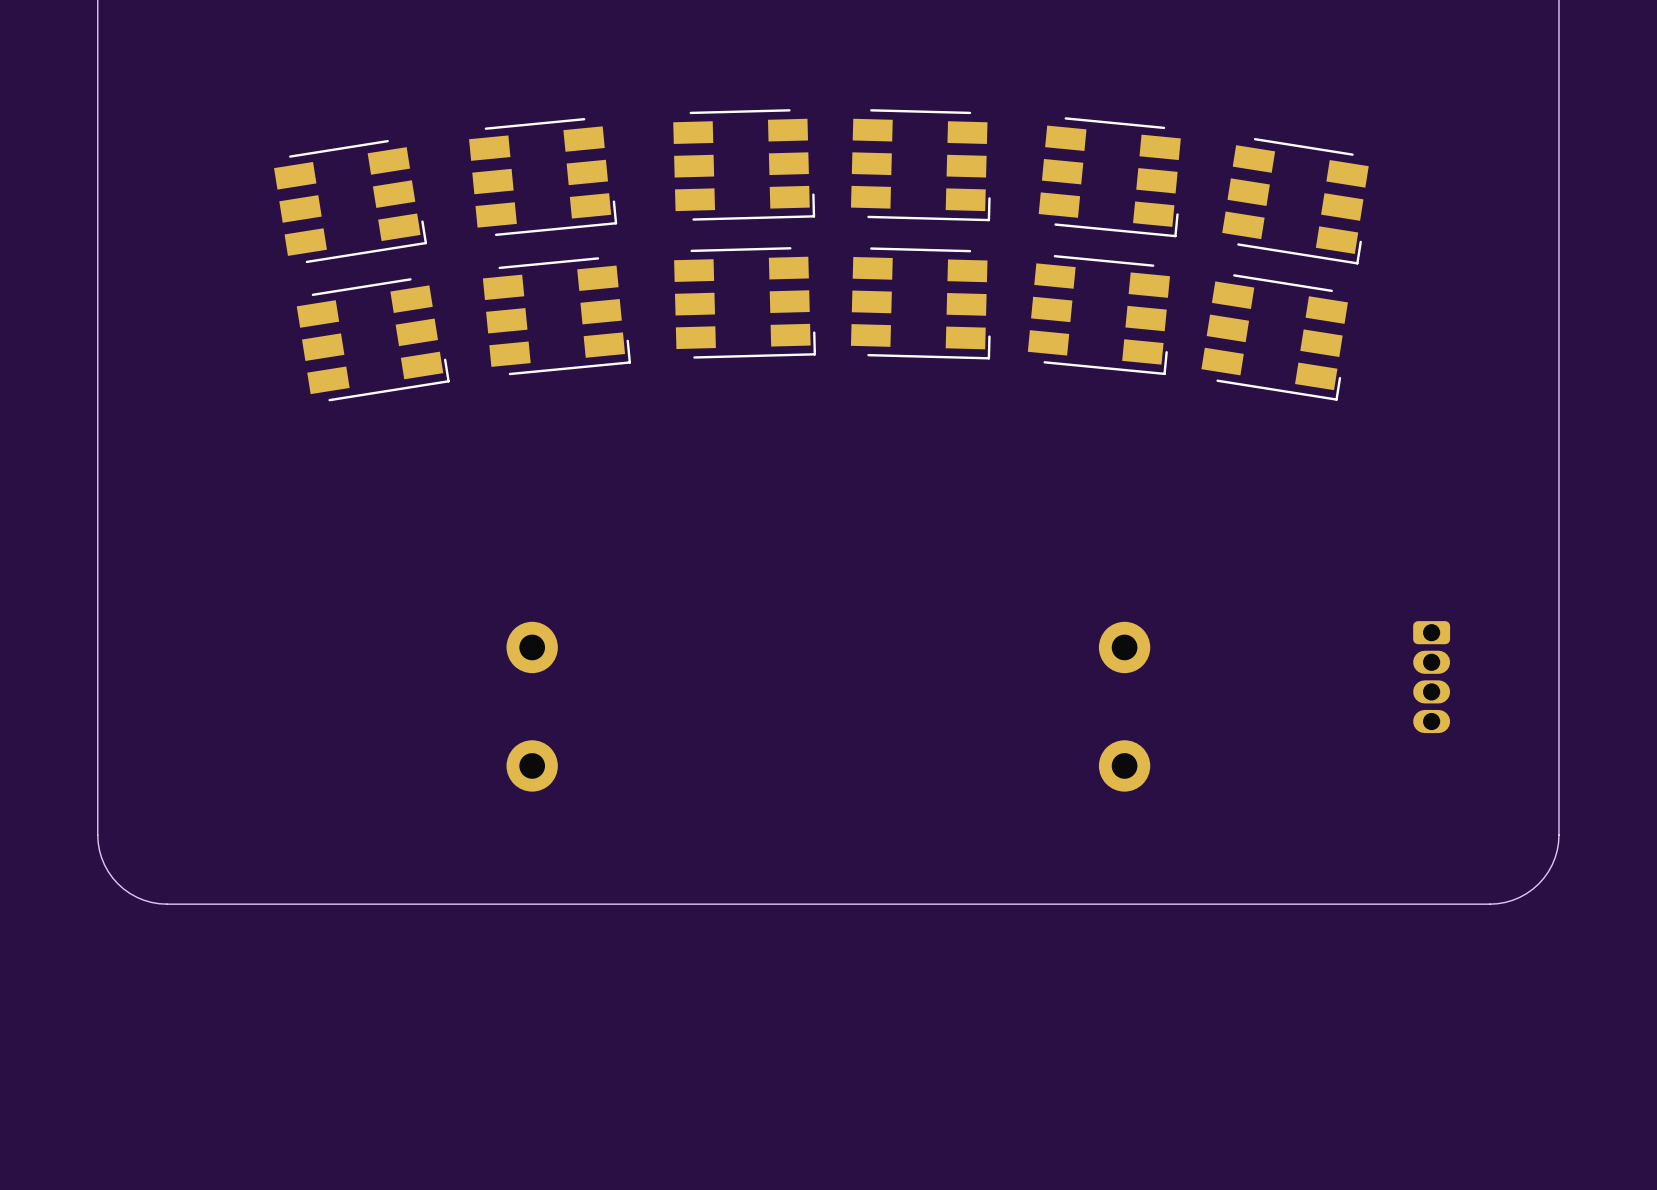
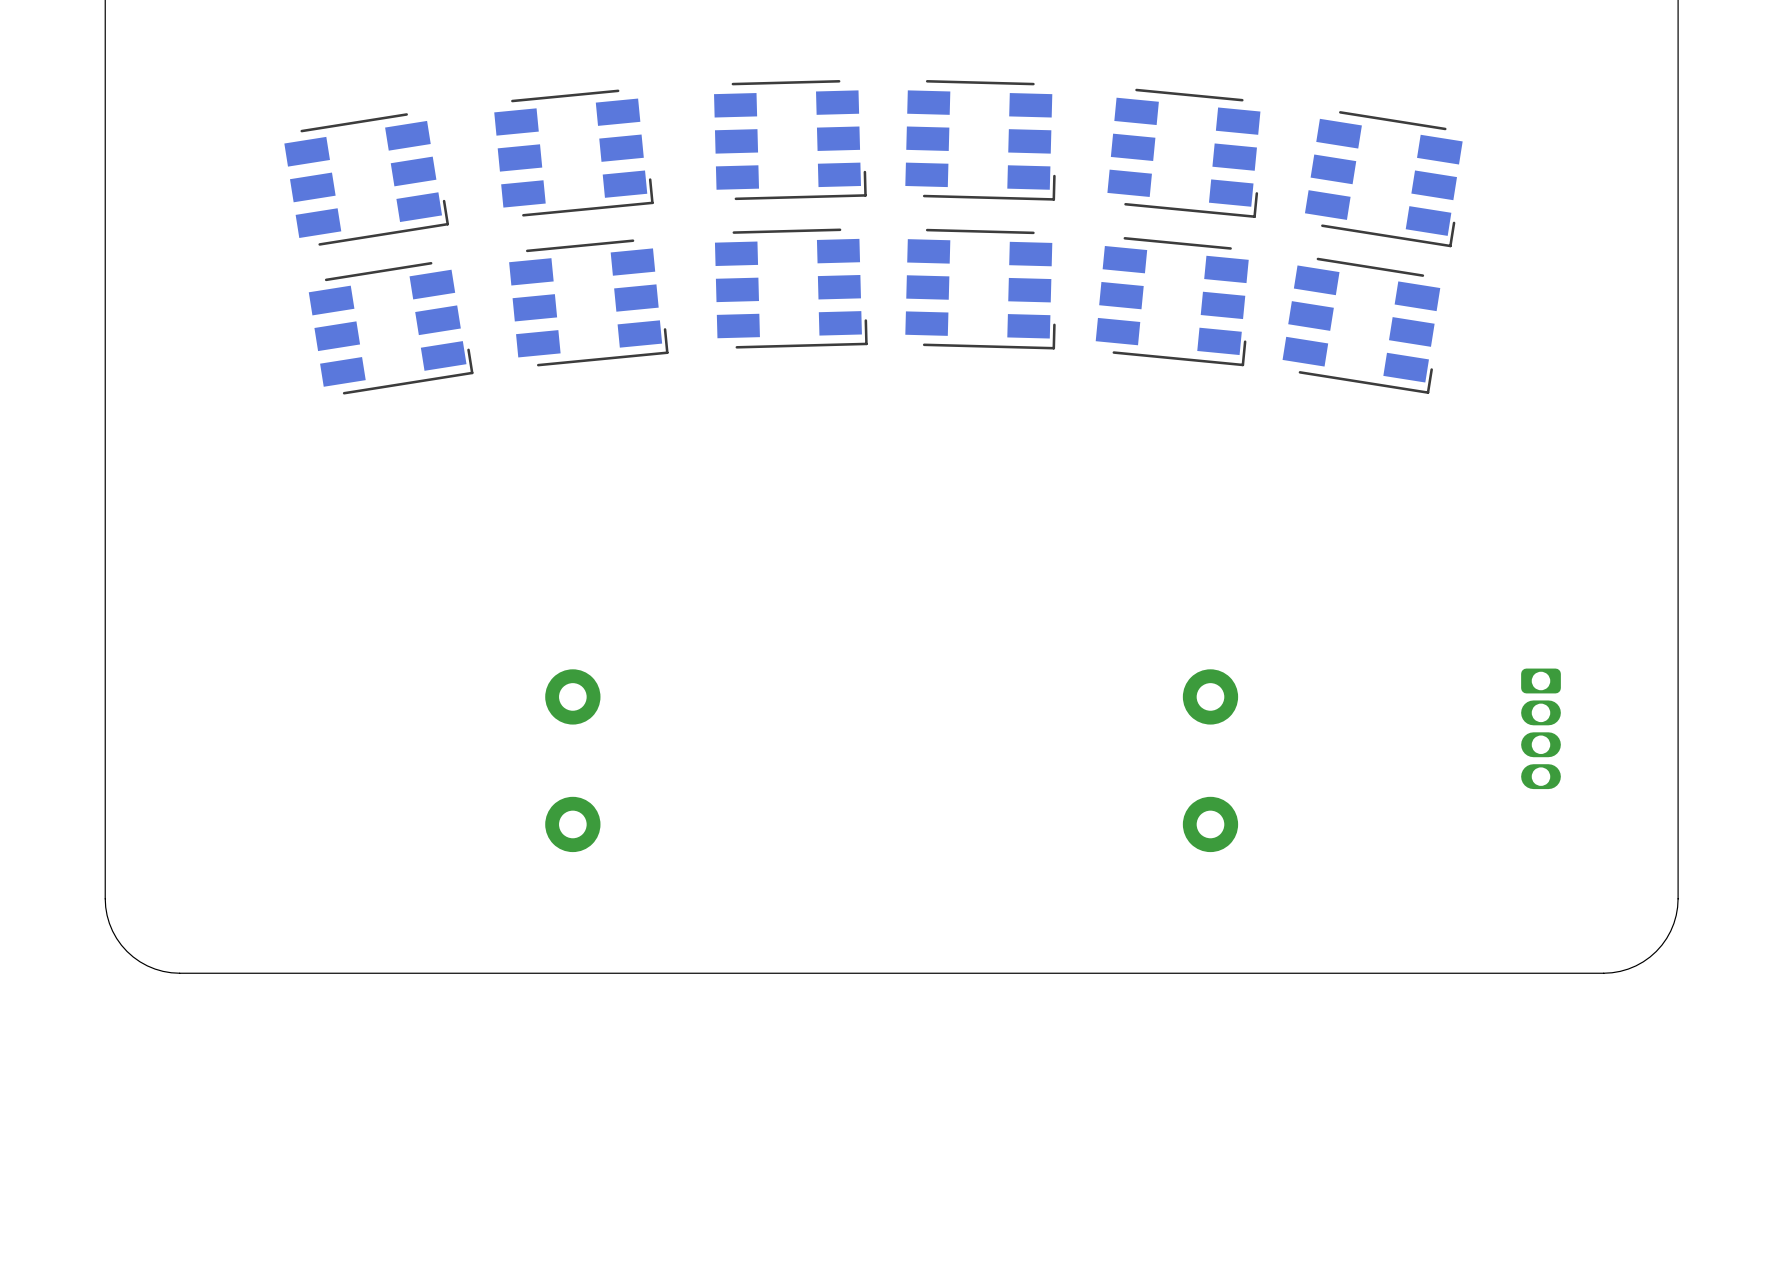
part position: (744, 164) -> (790, 140)
part position: (920, 165) -> (980, 140)
part position: (543, 177) -> (573, 153)
part position: (1109, 177) -> (1183, 153)
part position: (350, 201) -> (366, 179)
part position: (1295, 201) -> (1383, 179)
part position: (745, 302) -> (791, 288)
part position: (920, 303) -> (980, 289)
part position: (1098, 315) -> (1172, 301)
part position: (556, 316) -> (588, 302)
part position: (1274, 337) -> (1361, 325)
part position: (373, 339) -> (391, 328)

